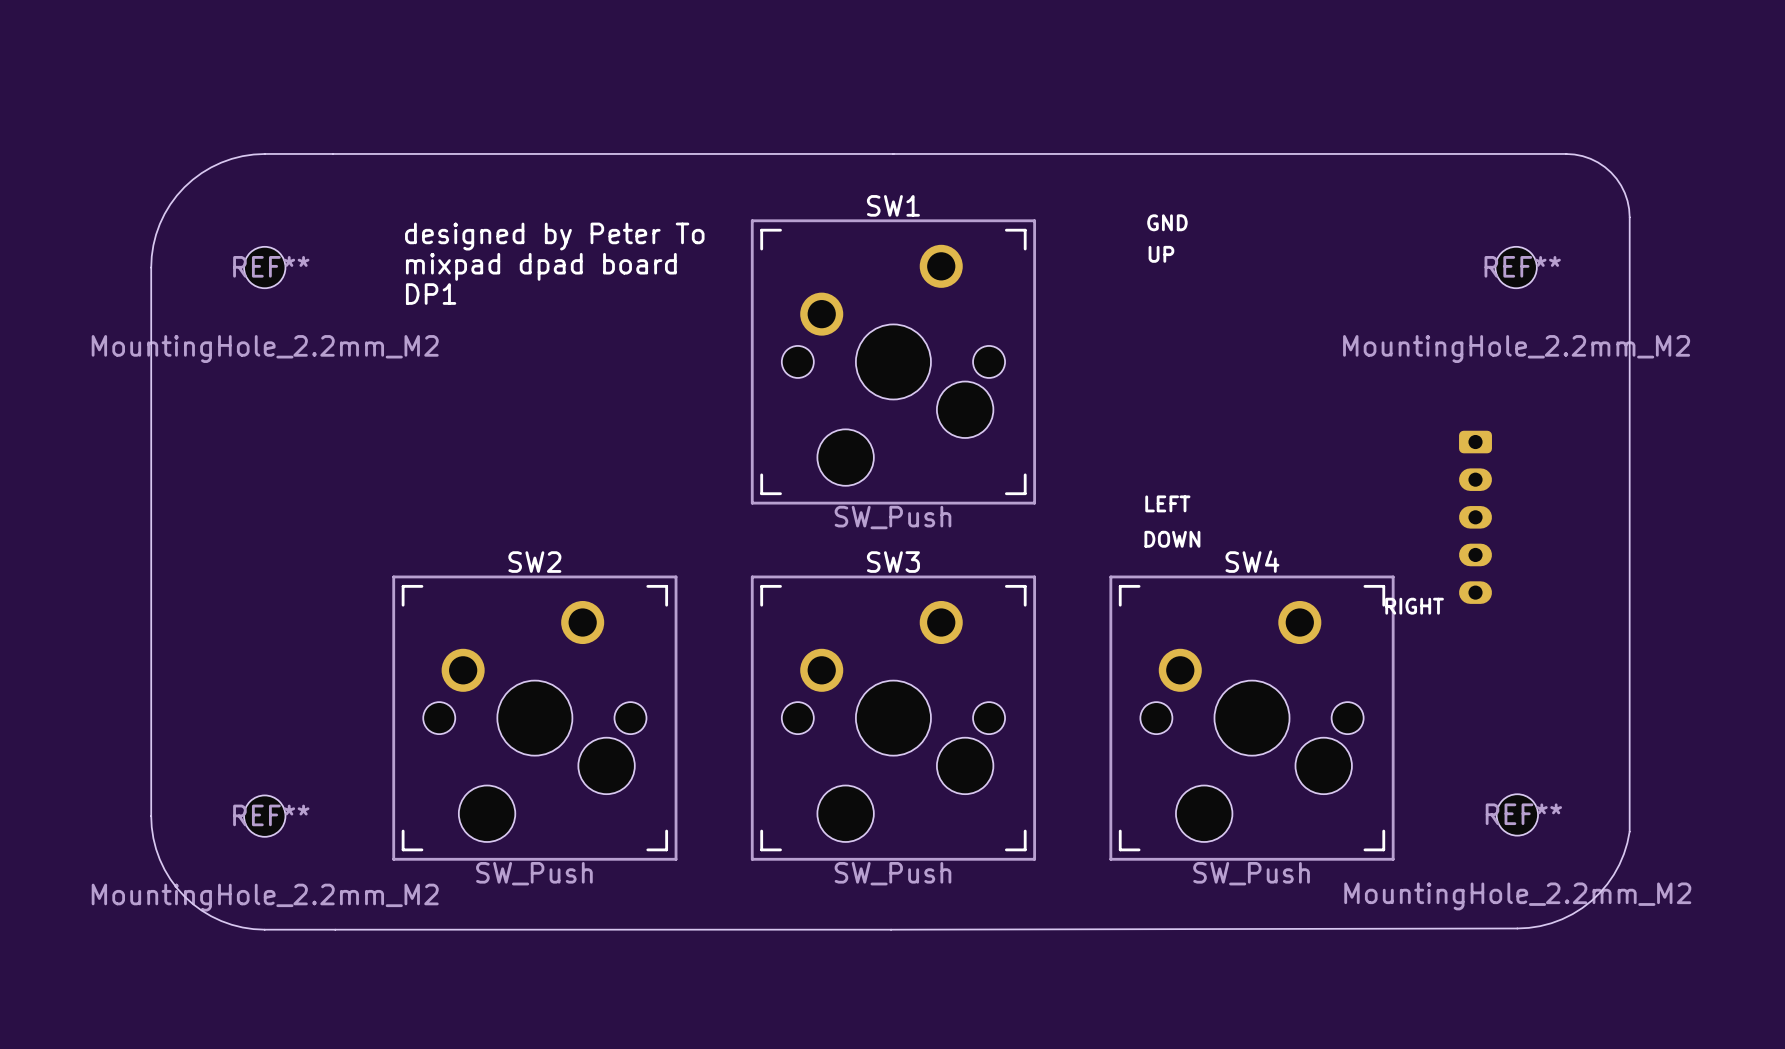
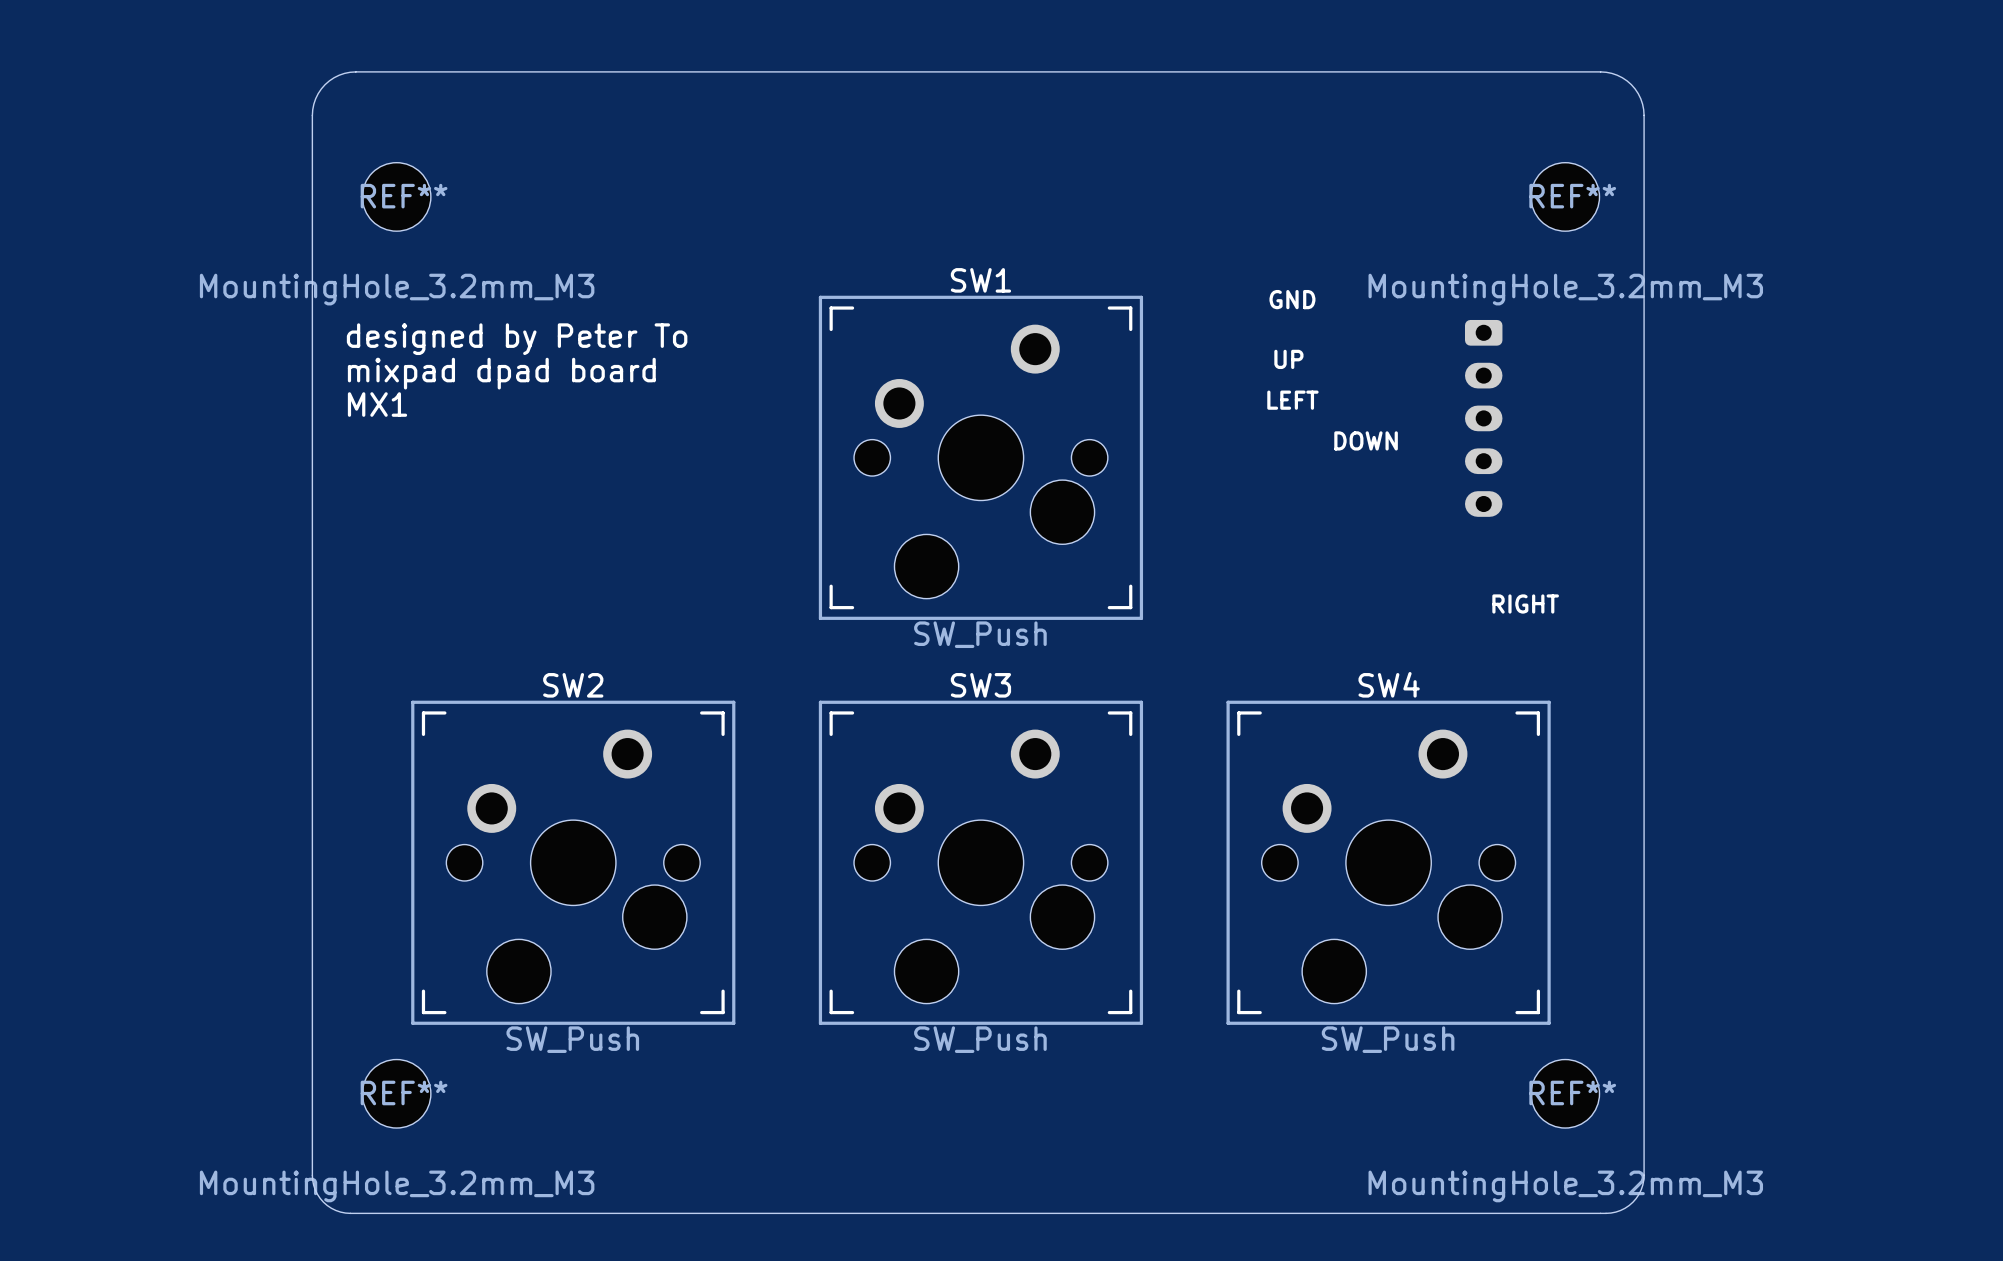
REF**: none -> MountingHole_3.2mm_M3 (396, 196)
REF**: none -> MountingHole_3.2mm_M3 (1565, 196)
board edge: (264, 153) (1566, 153) (1582, 156) (1598, 162) (1611, 172) (1621, 185) (1627, 200) (1629, 217) (1629, 831) (1619, 864) (1607, 884) (1582, 908) (1551, 923) (1517, 928) (264, 929) (231, 924) (211, 916) (192, 903) (170, 879) (159, 859) (151, 827) (151, 256) (156, 234) (164, 214) (176, 195) (192, 179) (211, 167) (231, 158) (264, 153) -> (355, 71) (339, 75) (325, 84) (315, 98) (312, 115) (312, 1175) (315, 1189) (323, 1202) (335, 1210) (350, 1213) (1606, 1213) (1620, 1210) (1632, 1202) (1641, 1189) (1644, 1175) (1644, 115) (1640, 98) (1631, 84) (1617, 75) (1600, 71) (355, 71)
text position: designed by Peter To (554, 236) -> designed by Peter To (517, 339)
text position: UP (1161, 254) -> UP (1288, 359)
text position: mixpad dpad board (541, 266) -> mixpad dpad board (501, 373)
REF**: MountingHole_2.2mm_M2 (264, 267) -> none
REF**: MountingHole_2.2mm_M2 (1516, 267) -> none
text: DP1 (431, 294) -> none
text: none -> MX1 (377, 404)
text position: LEFT (1167, 503) -> LEFT (1292, 400)
part position: (1475, 517) -> (1483, 418)
text position: DOWN (1172, 539) -> DOWN (1366, 440)
text position: RIGHT (1414, 606) -> RIGHT (1525, 603)
REF**: MountingHole_2.2mm_M2 (1517, 814) -> none
REF**: MountingHole_2.2mm_M2 (264, 816) -> none
REF**: none -> MountingHole_3.2mm_M3 (396, 1093)
REF**: none -> MountingHole_3.2mm_M3 (1565, 1093)

